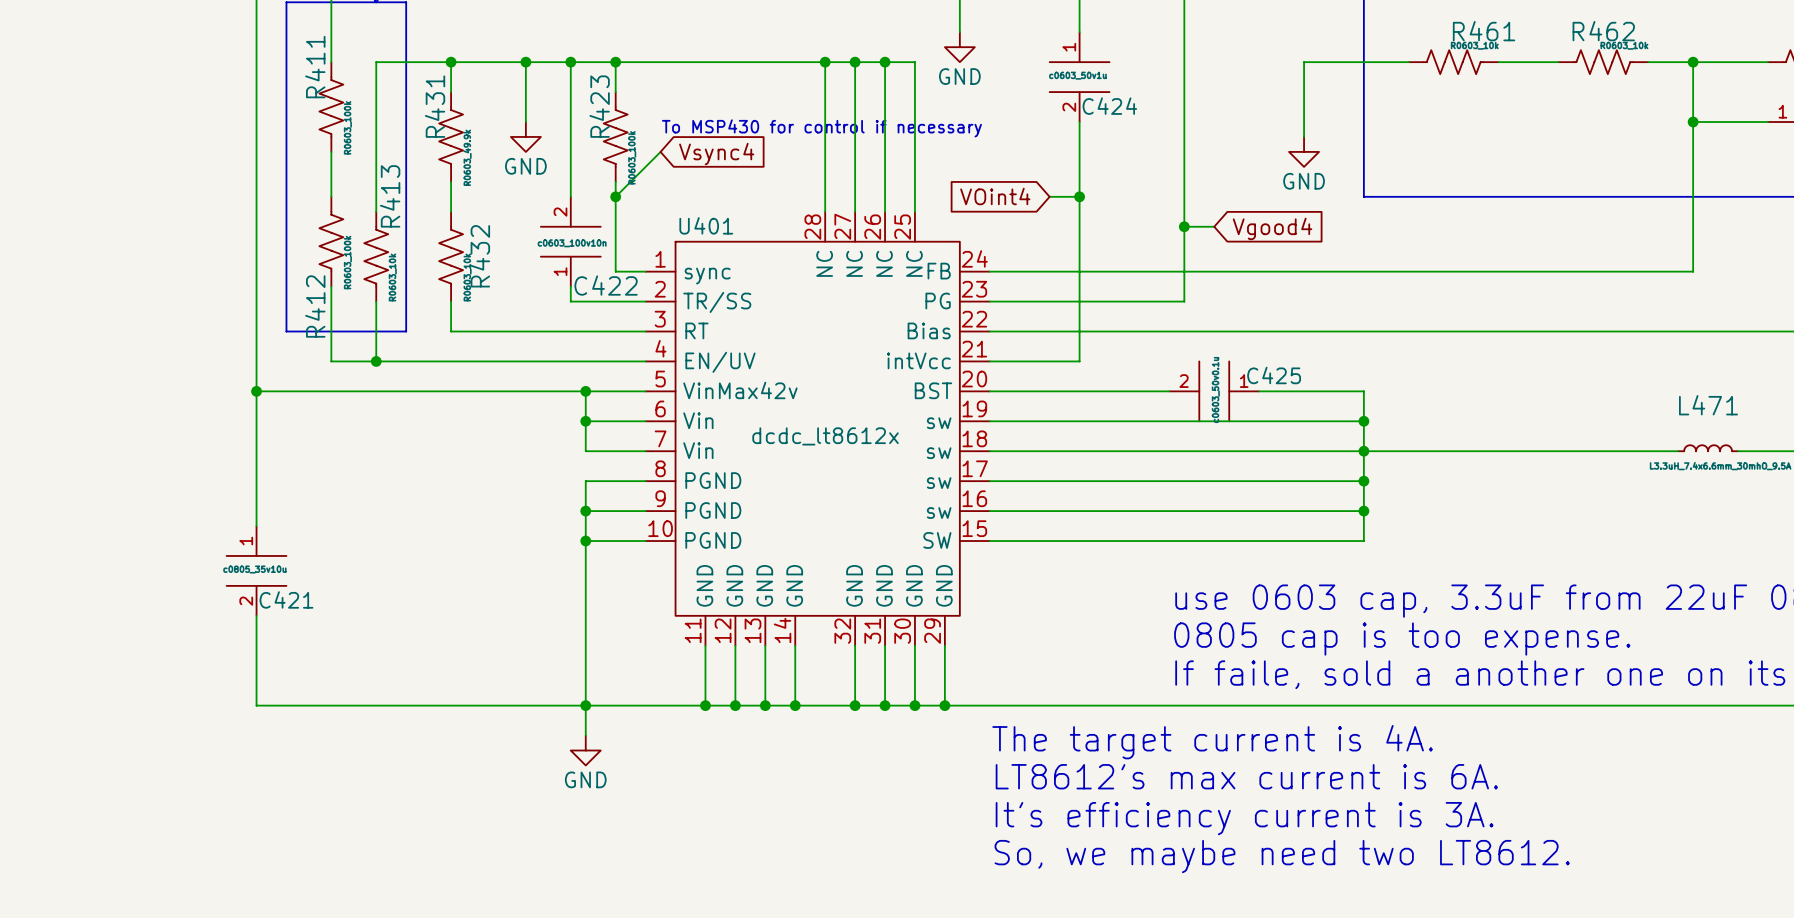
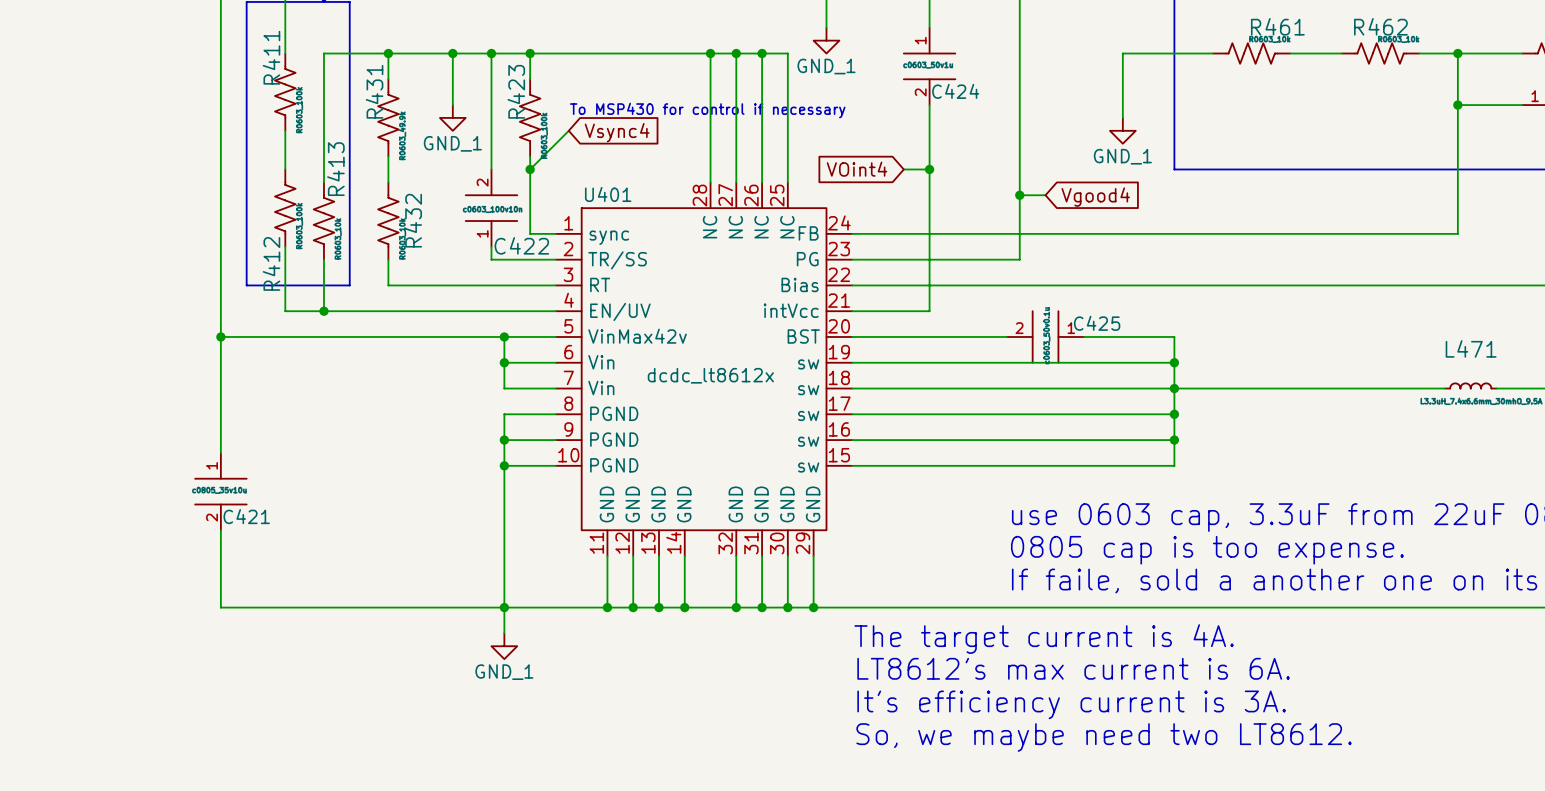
power symbol: GND (959, 47) -> GND_1 (826, 40)
power symbol: GND (525, 136) -> GND_1 (452, 117)
power symbol: GND (1304, 151) -> GND_1 (1122, 130)
U401 pin name: SW (937, 540) -> sw (808, 467)
power symbol: GND (585, 750) -> GND_1 (504, 646)

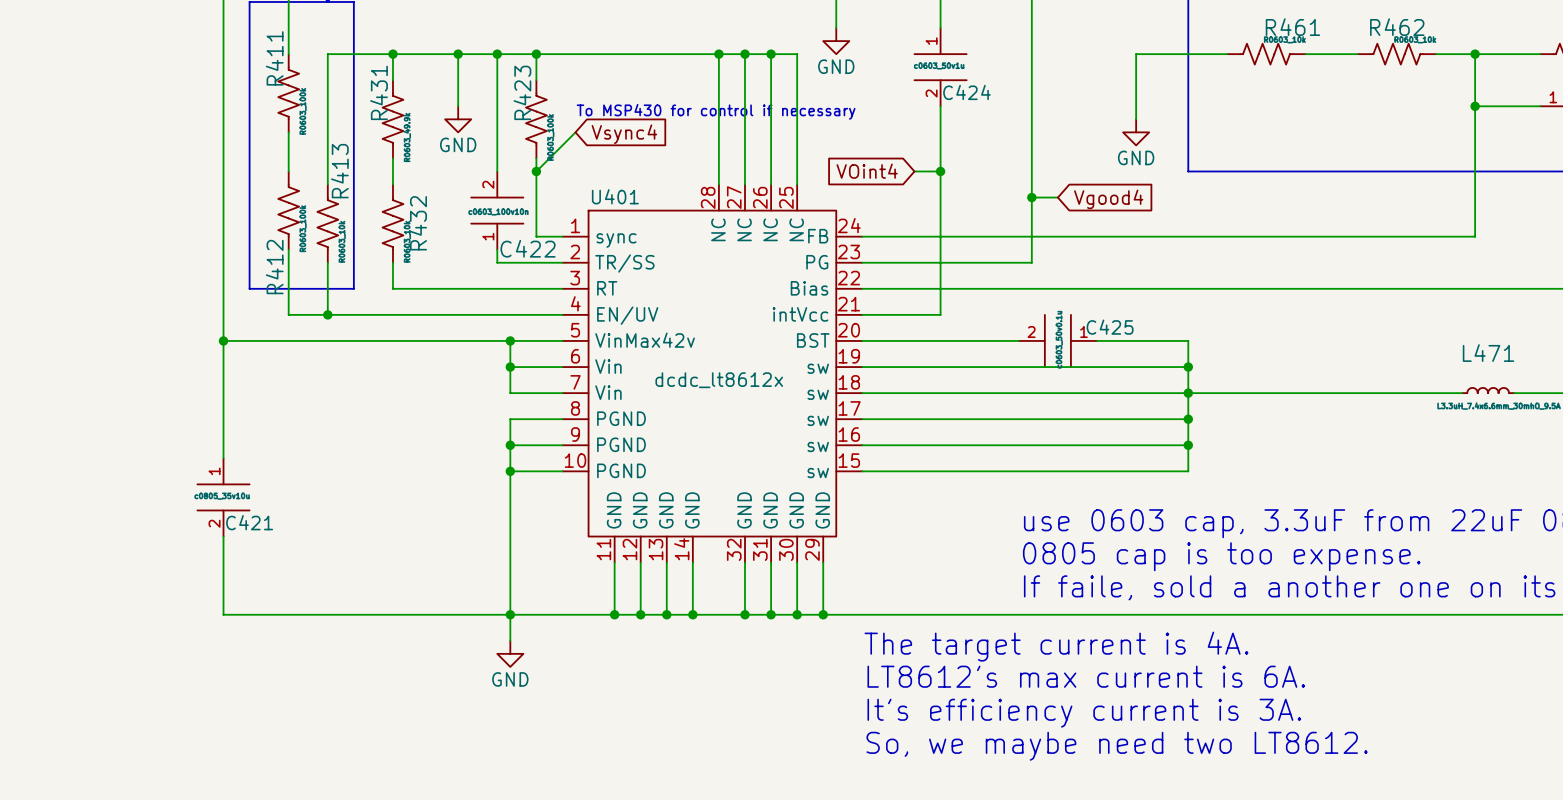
power symbol: GND_1 (826, 40) -> GND (836, 41)
power symbol: GND_1 (452, 117) -> GND (458, 119)
power symbol: GND_1 (1122, 130) -> GND (1136, 132)
power symbol: GND_1 (504, 646) -> GND (510, 653)

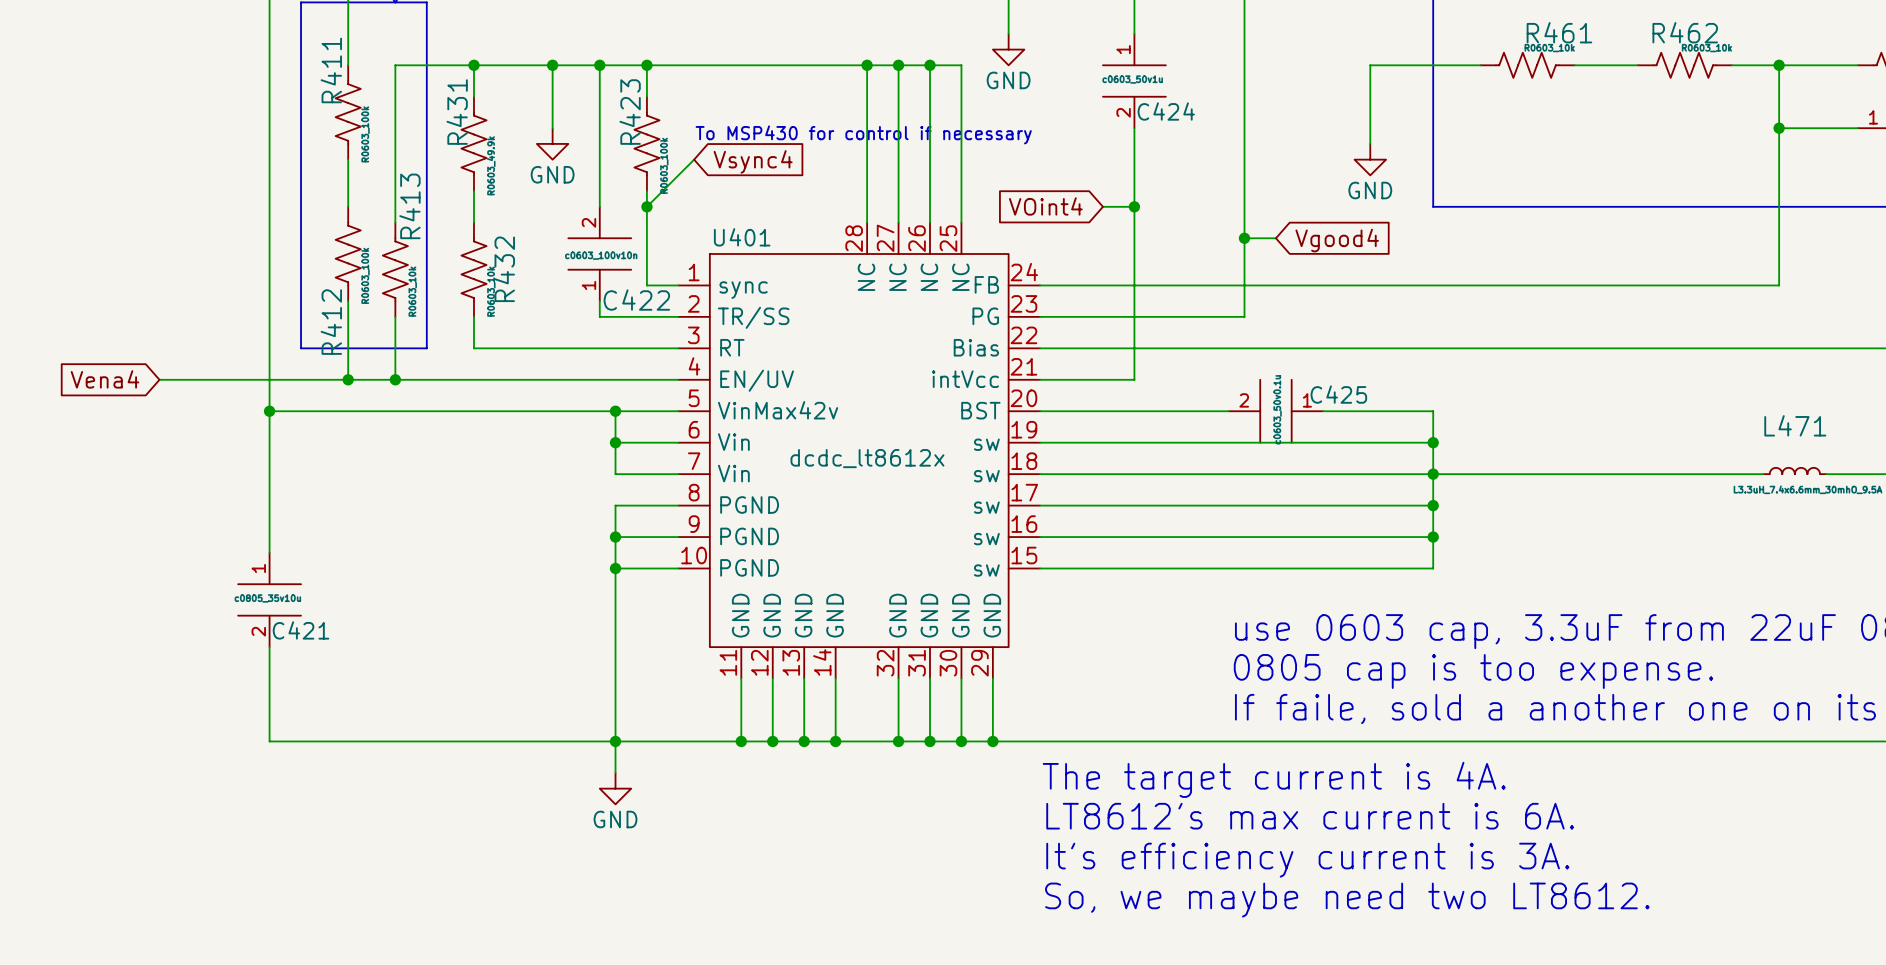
global label: none -> Vena4 (105, 379)
wire: none -> (159, 379) (348, 379)
junction: none -> (348, 379)

